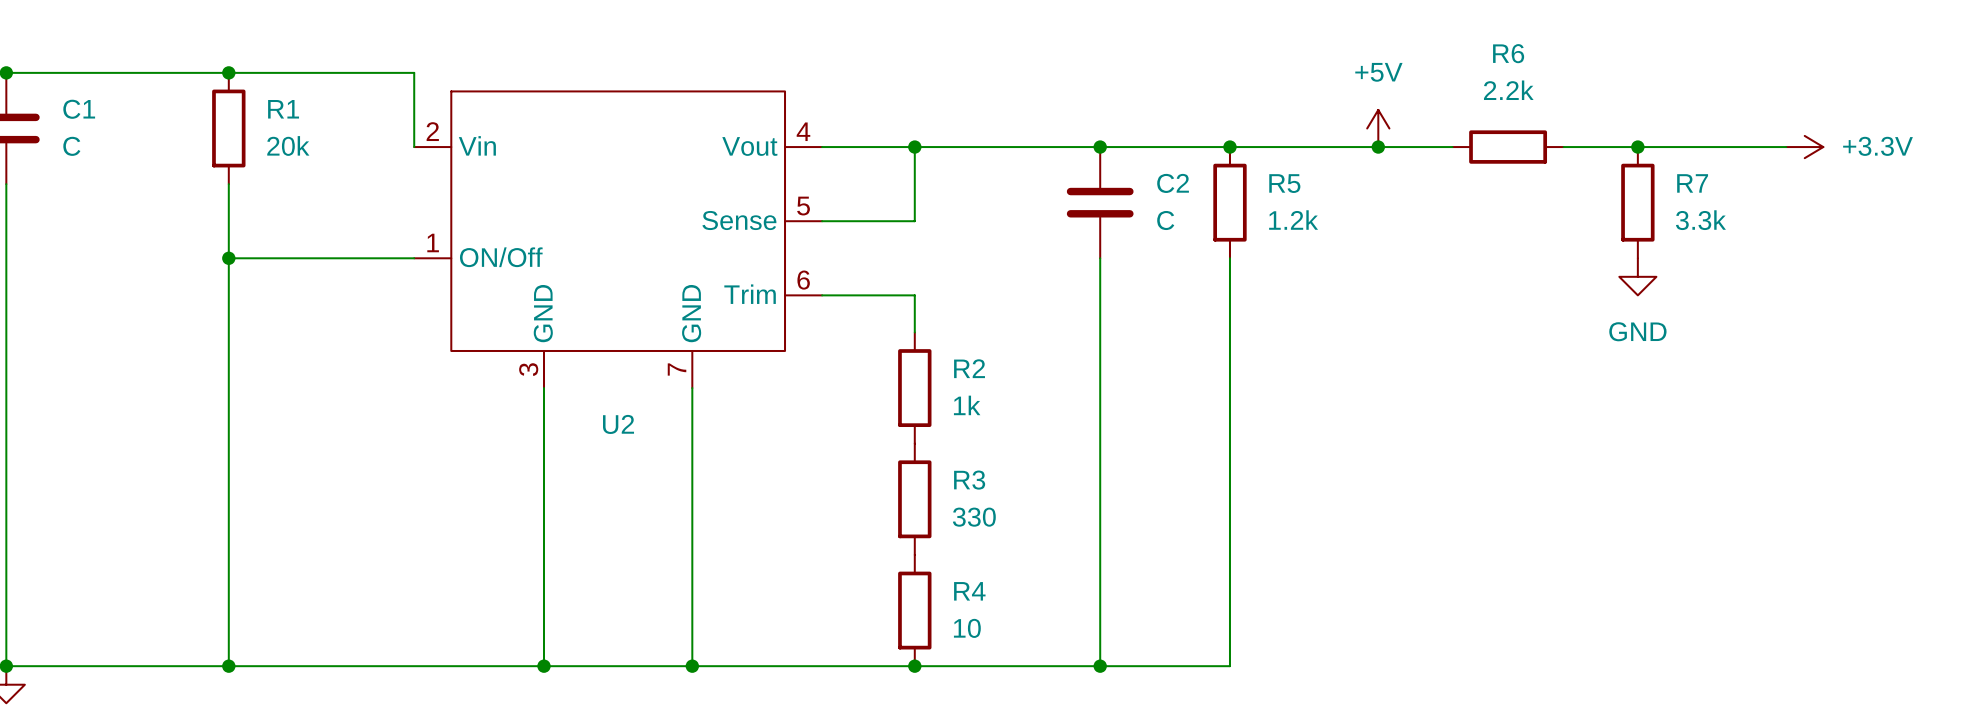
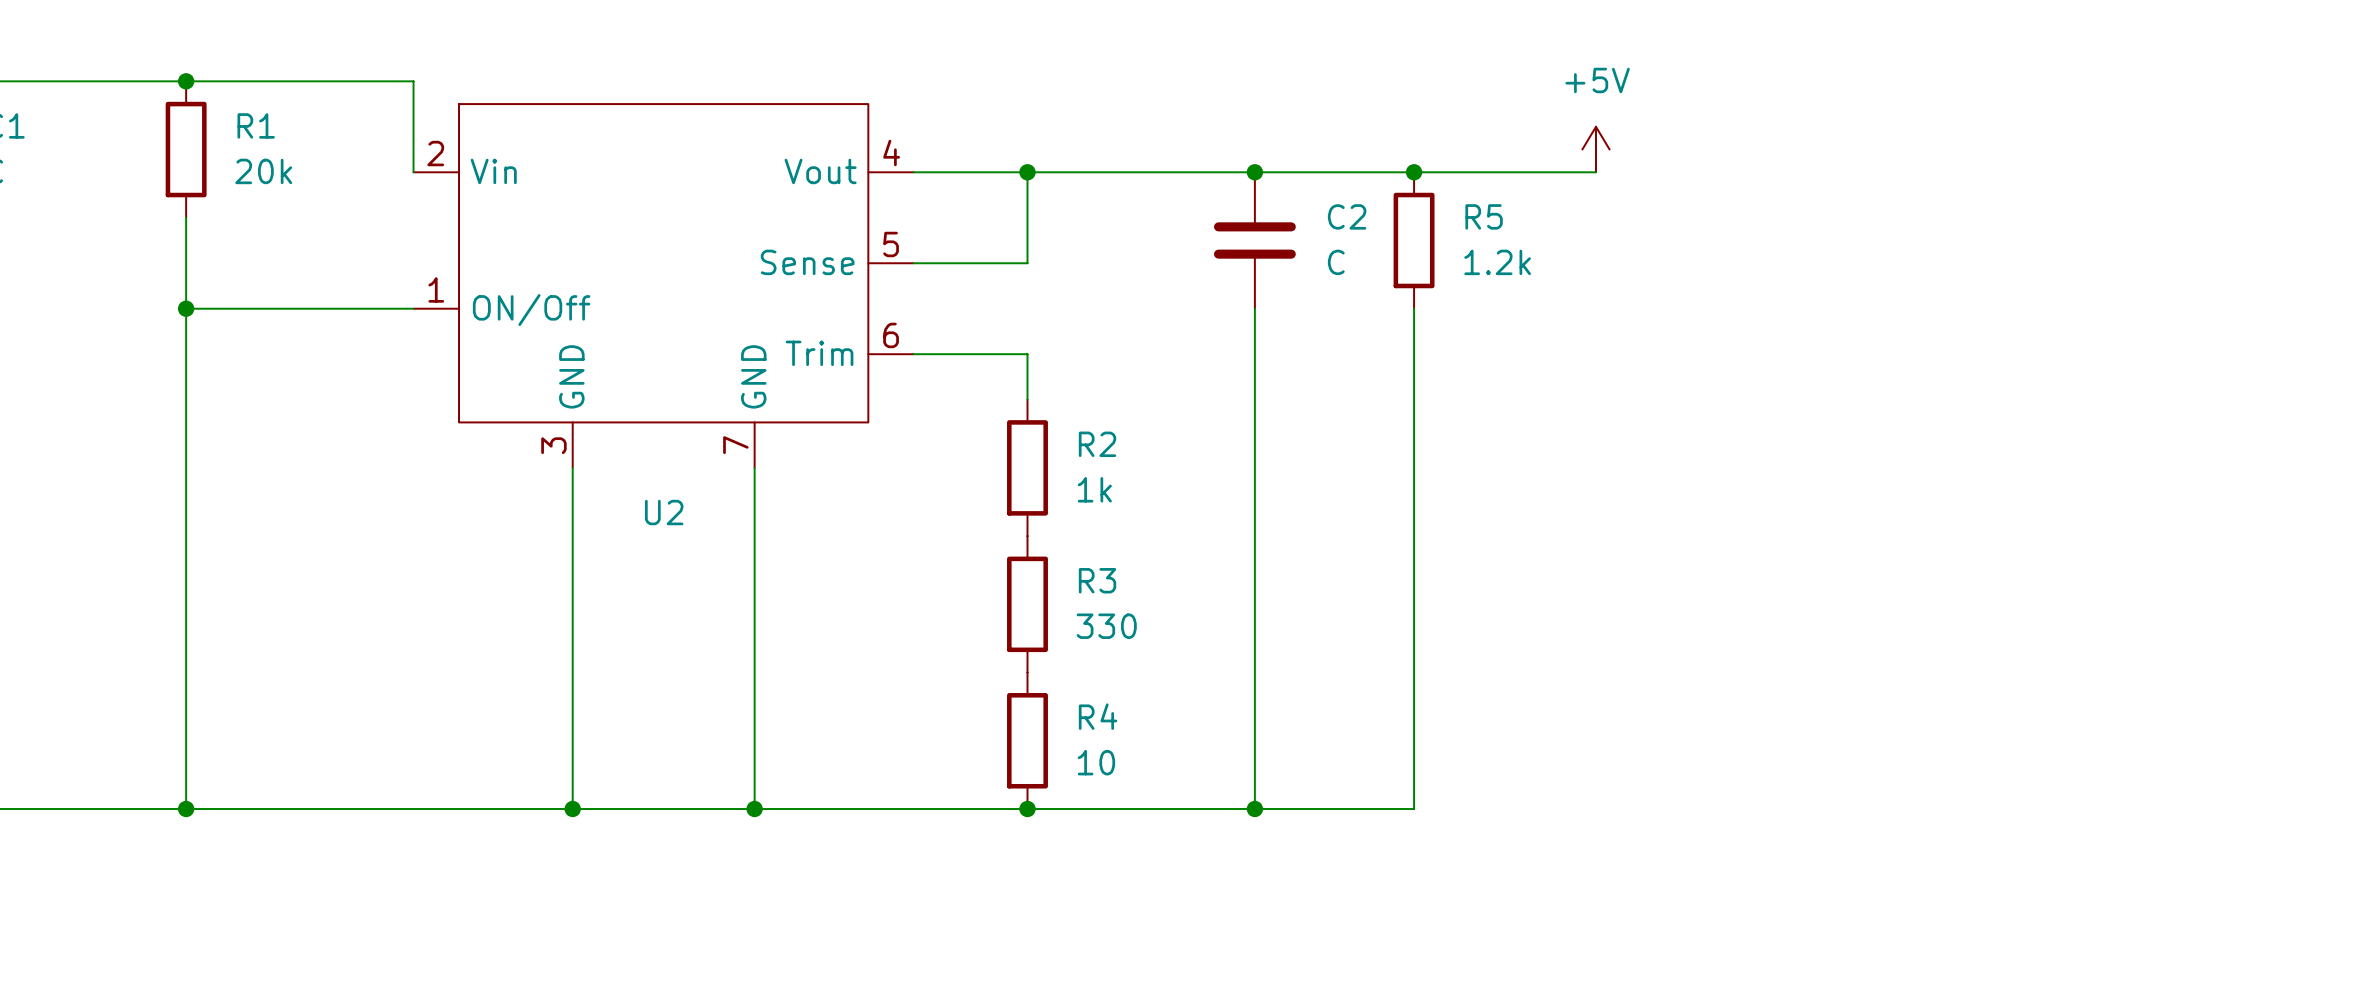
wire: (1378, 147) (1452, 147) -> none
junction: (1378, 147) -> none
R6: 2.2k (1508, 147) -> none
wire: (1563, 147) (1786, 147) -> none
junction: (1637, 147) -> none
power symbol: +3.3V (1804, 147) -> none
R7: 3.3k (1637, 202) -> none
power symbol: GND (1637, 276) -> none

